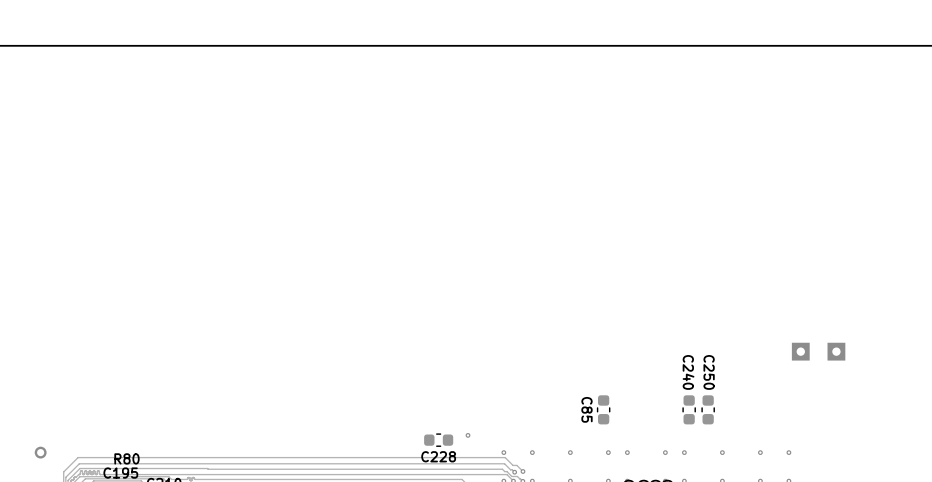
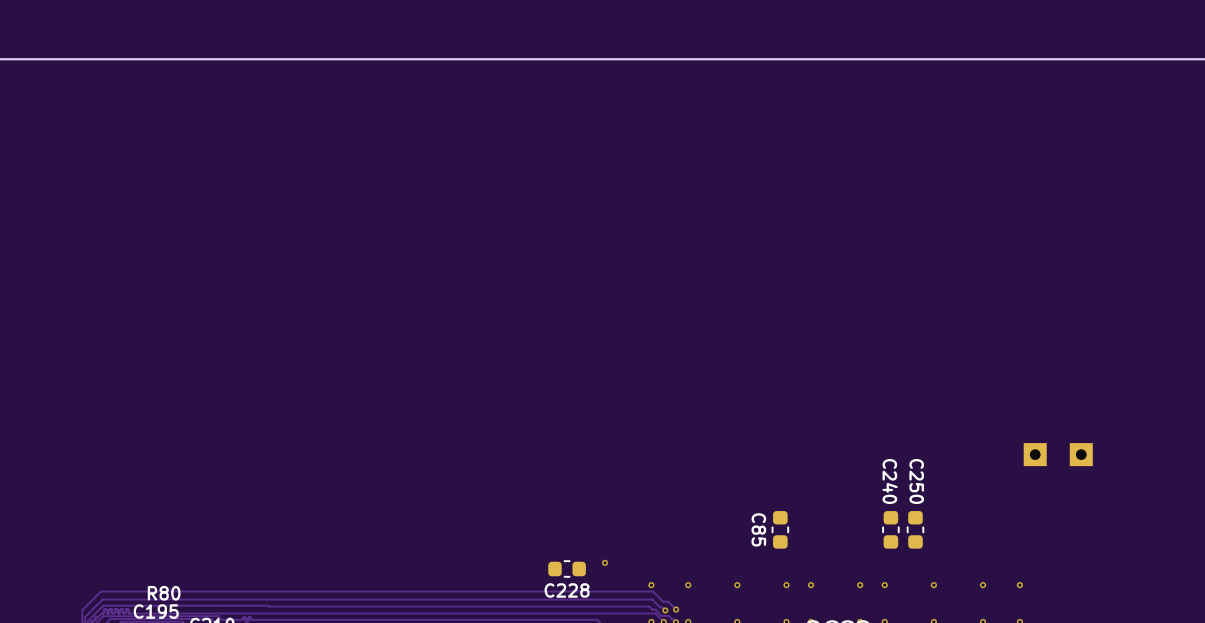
via: (40, 452) -> none

